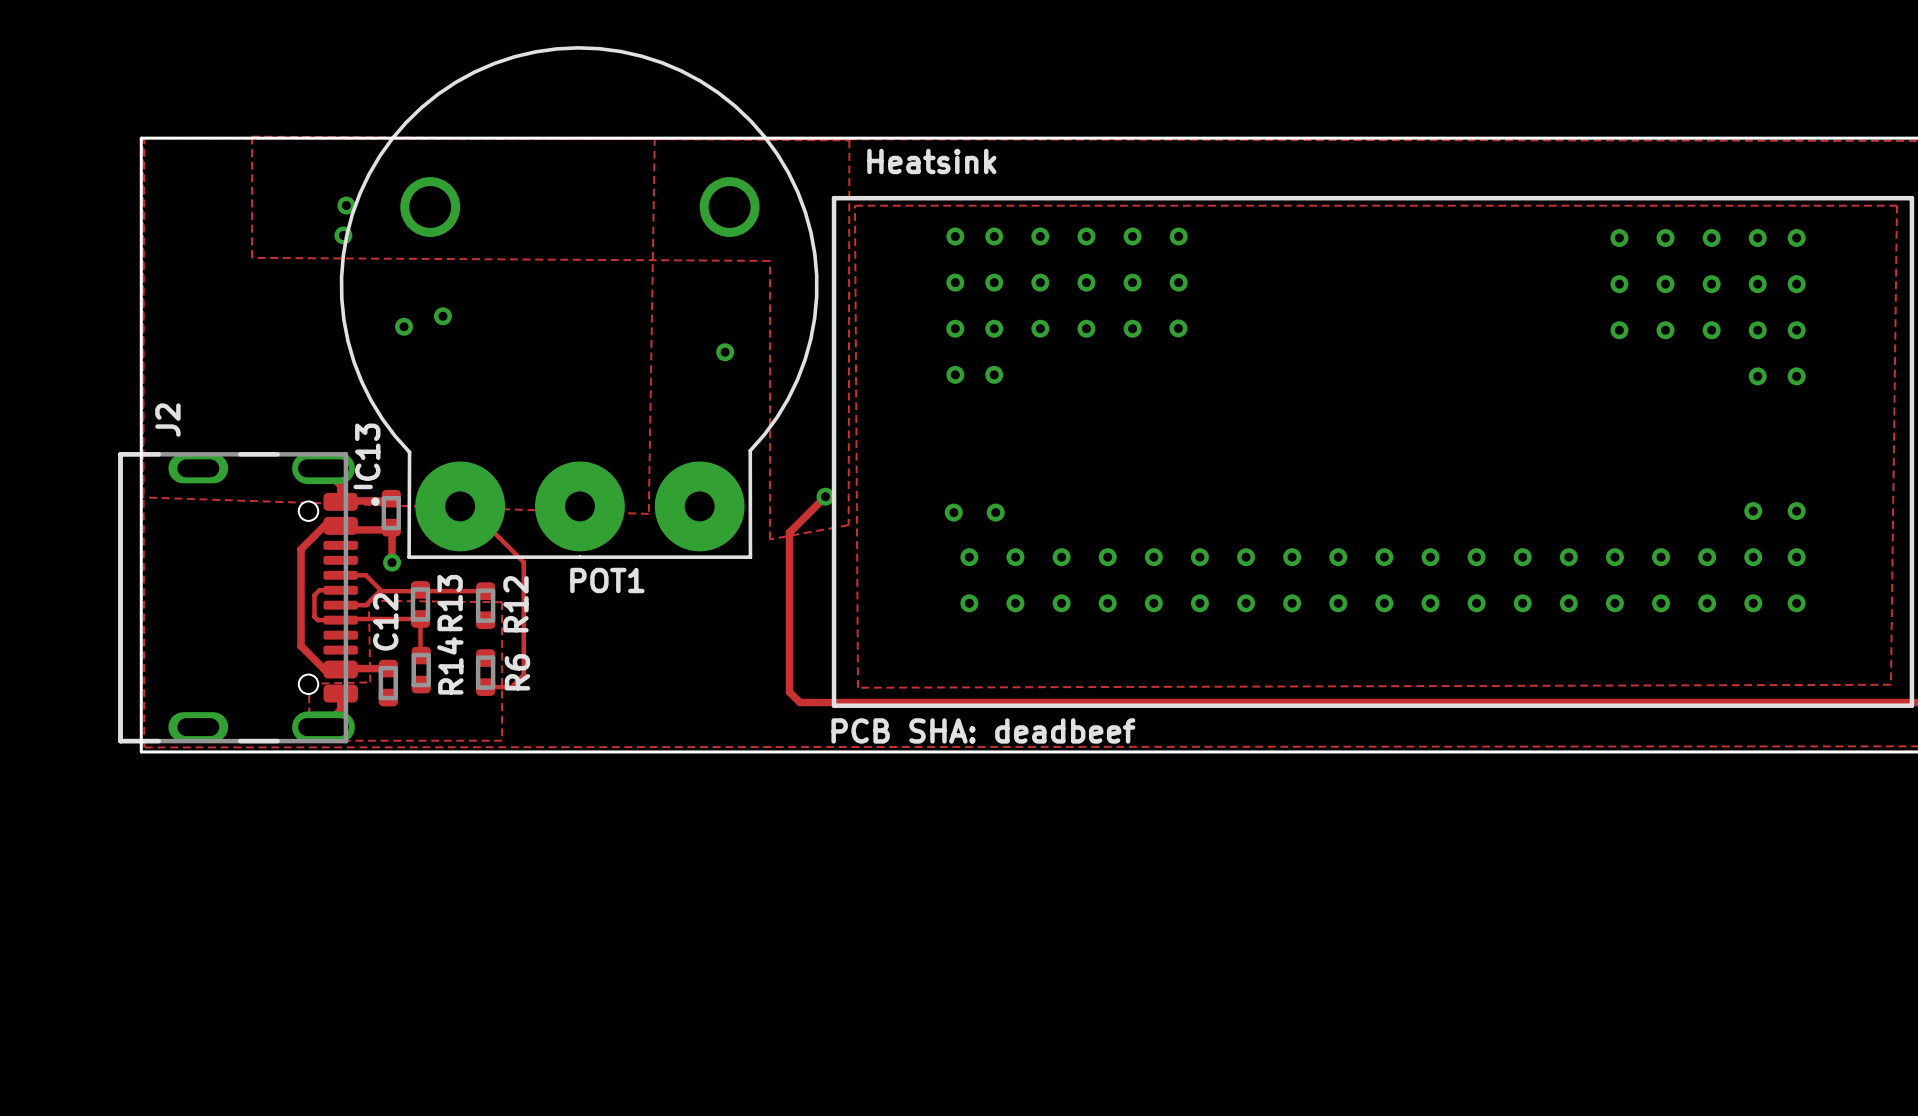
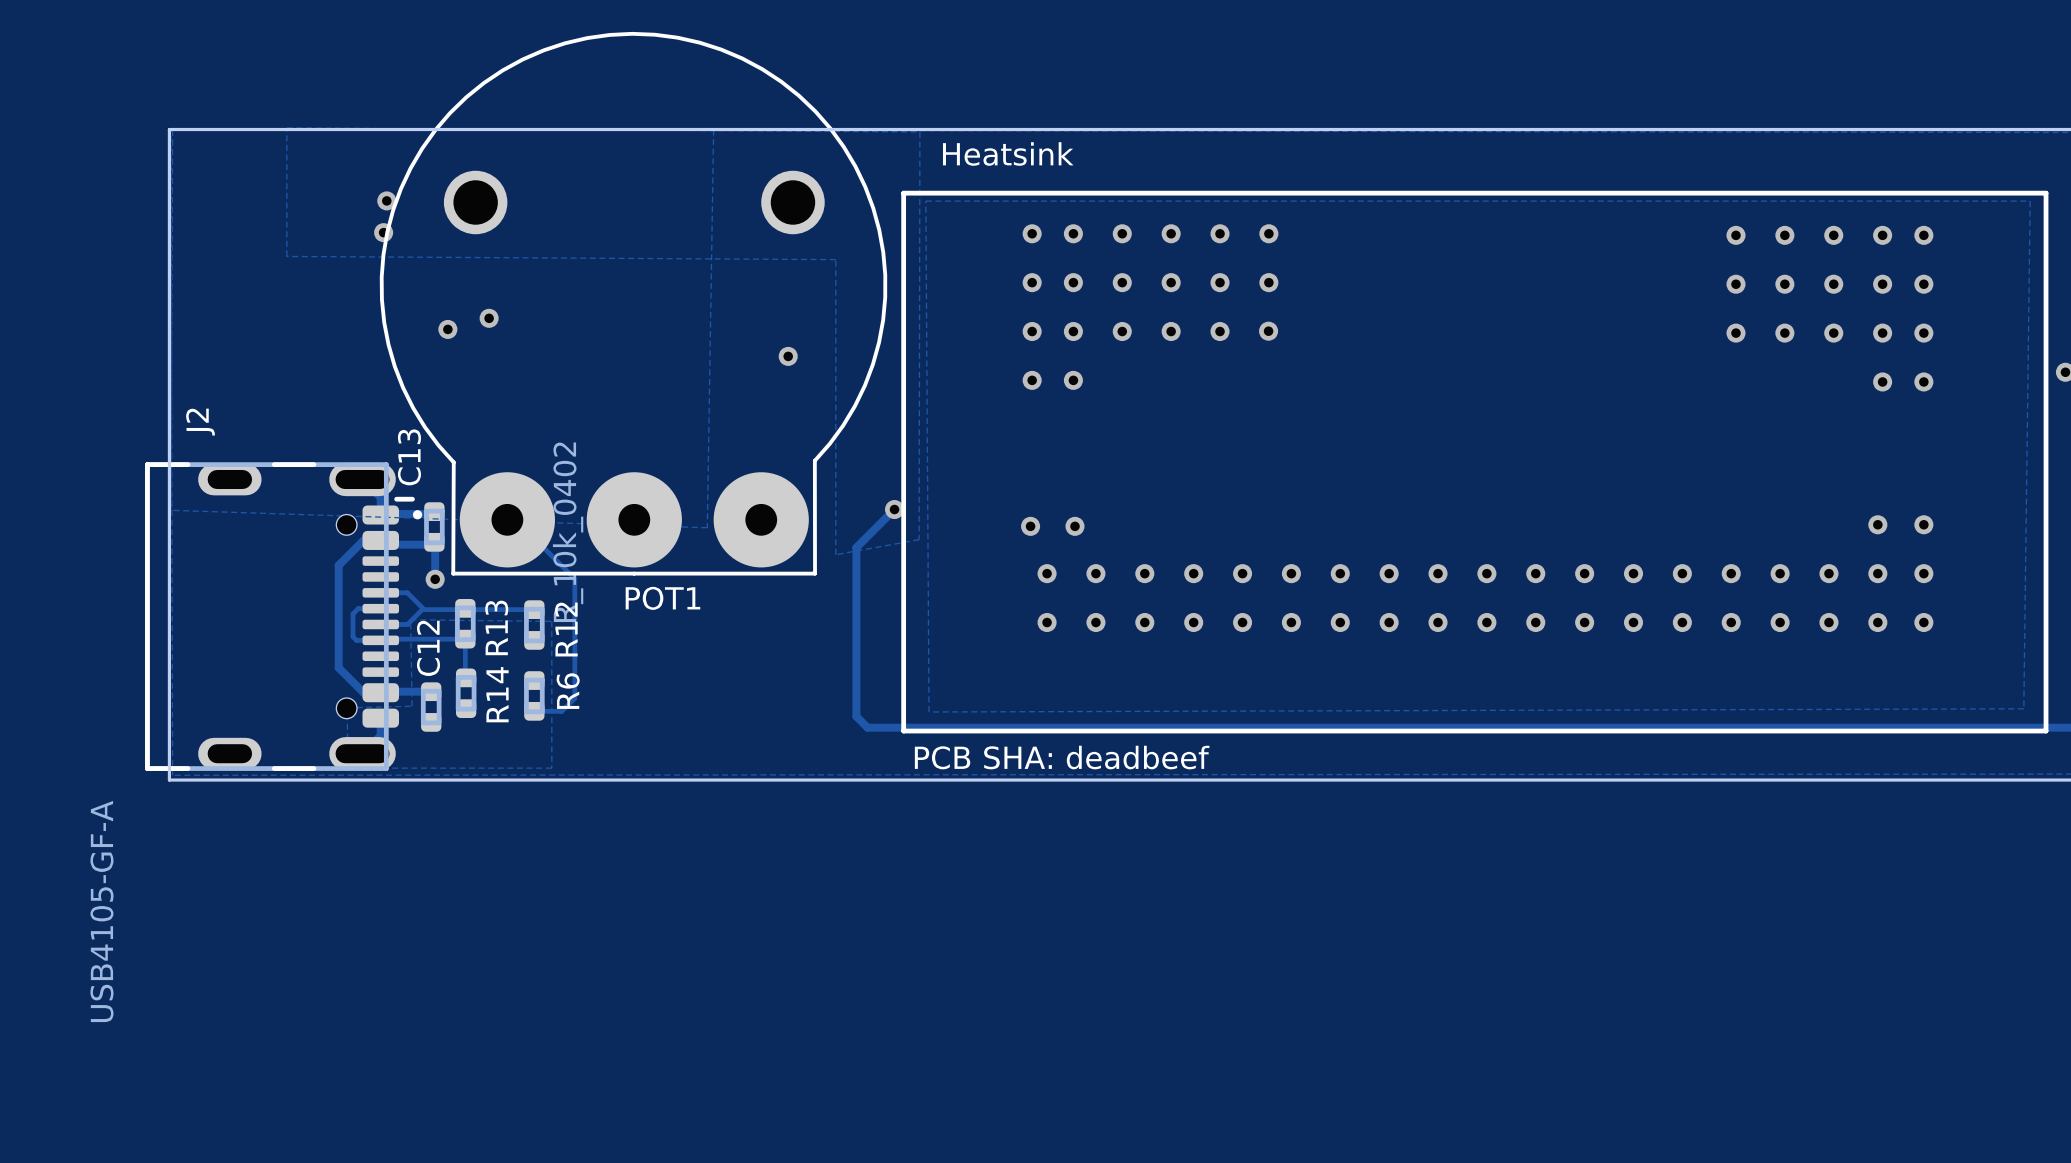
R12 value: none -> R_10k_0402 (568, 532)
J2 value: none -> USB4105-GF-A (101, 911)

